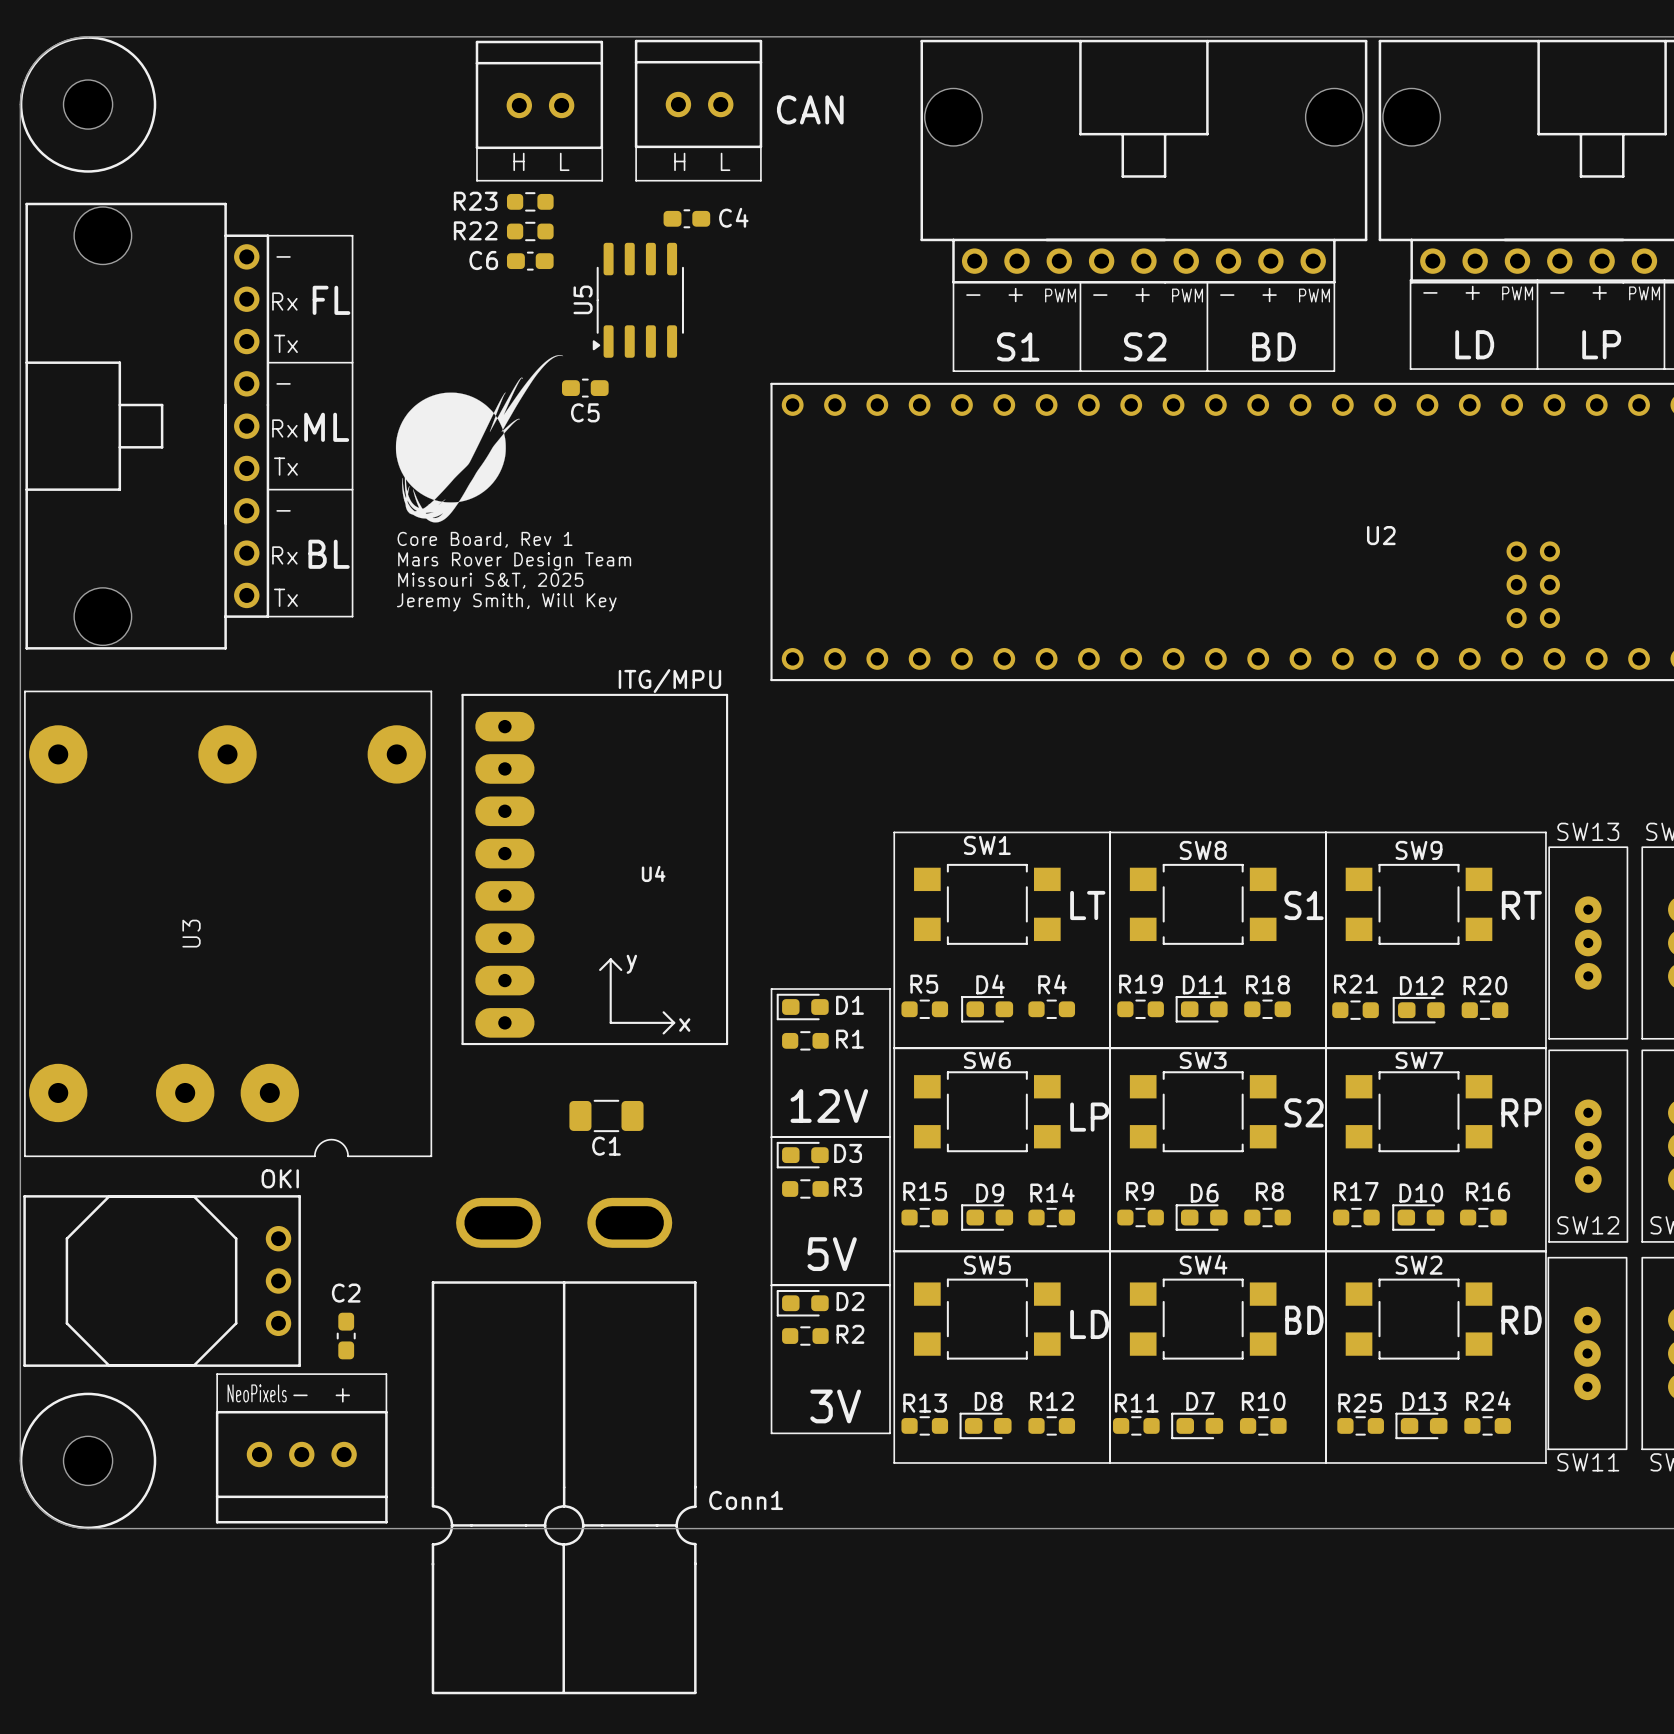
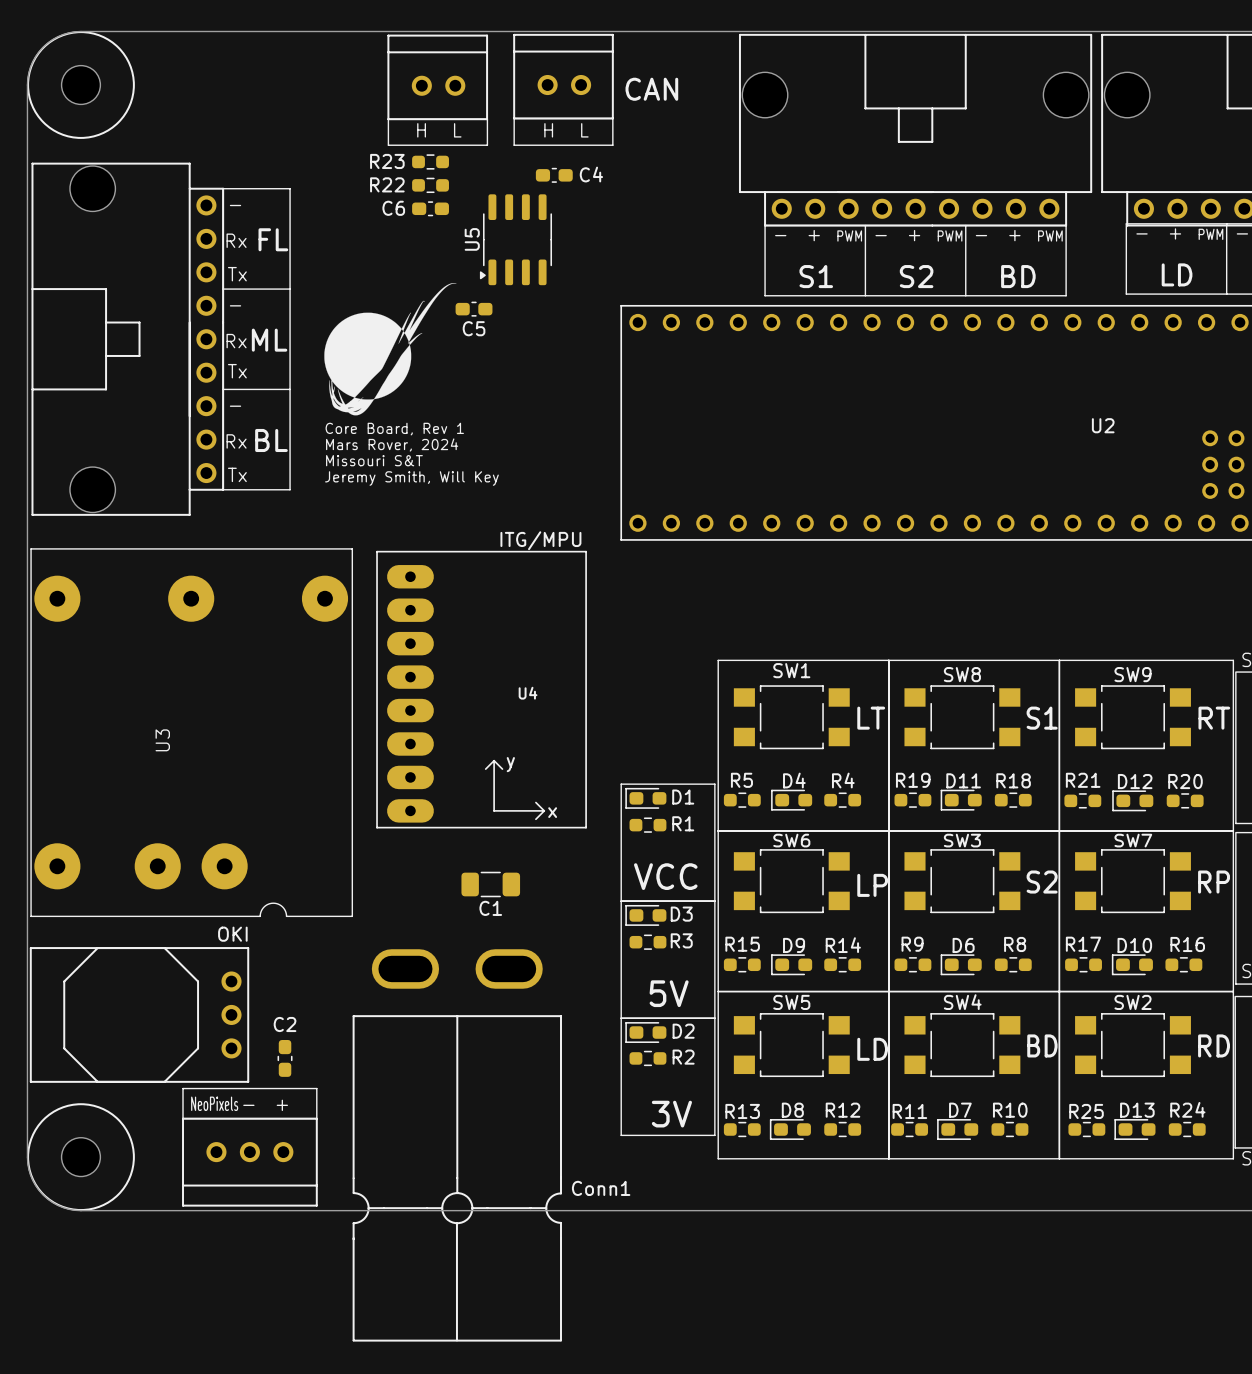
text: Mars Rover Design Team (514, 561) -> Mars Rover, 2024 (392, 445)
text: Missouri S&T, 2025 (490, 580) -> Missouri S&T (374, 460)
text: 12V (829, 1105) -> VCC (665, 876)

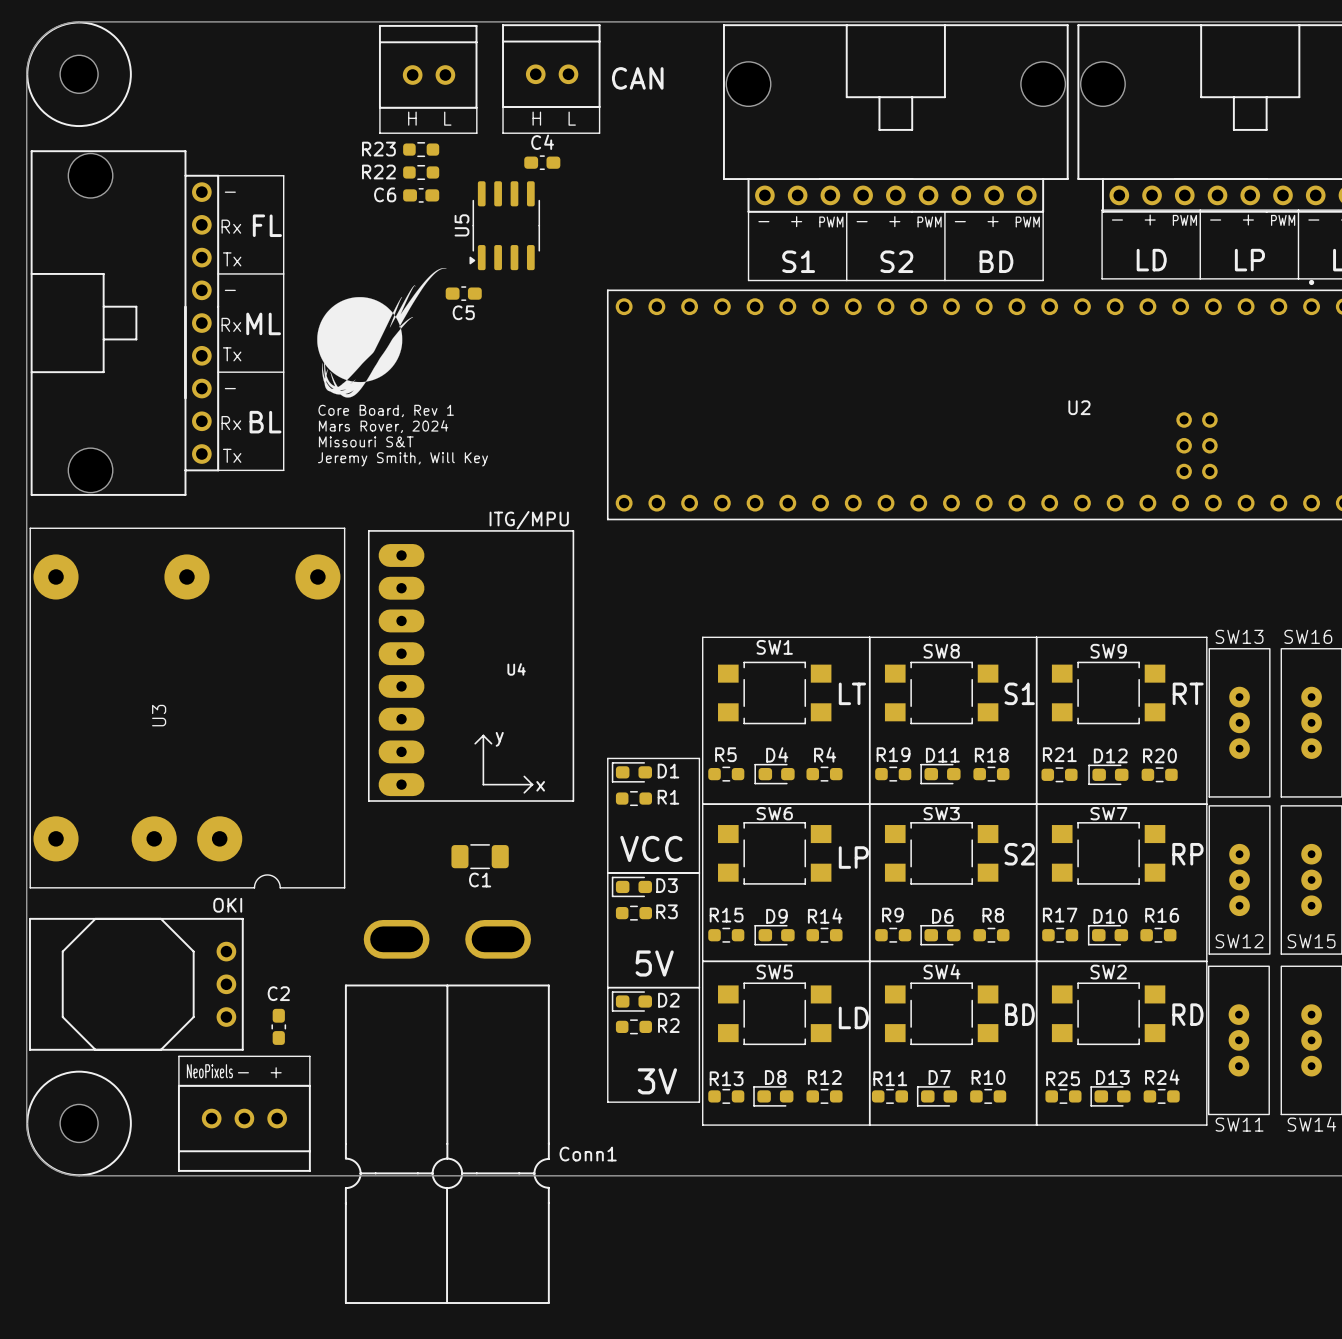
C4 name position: C4 (591, 174) -> C4 (542, 142)

